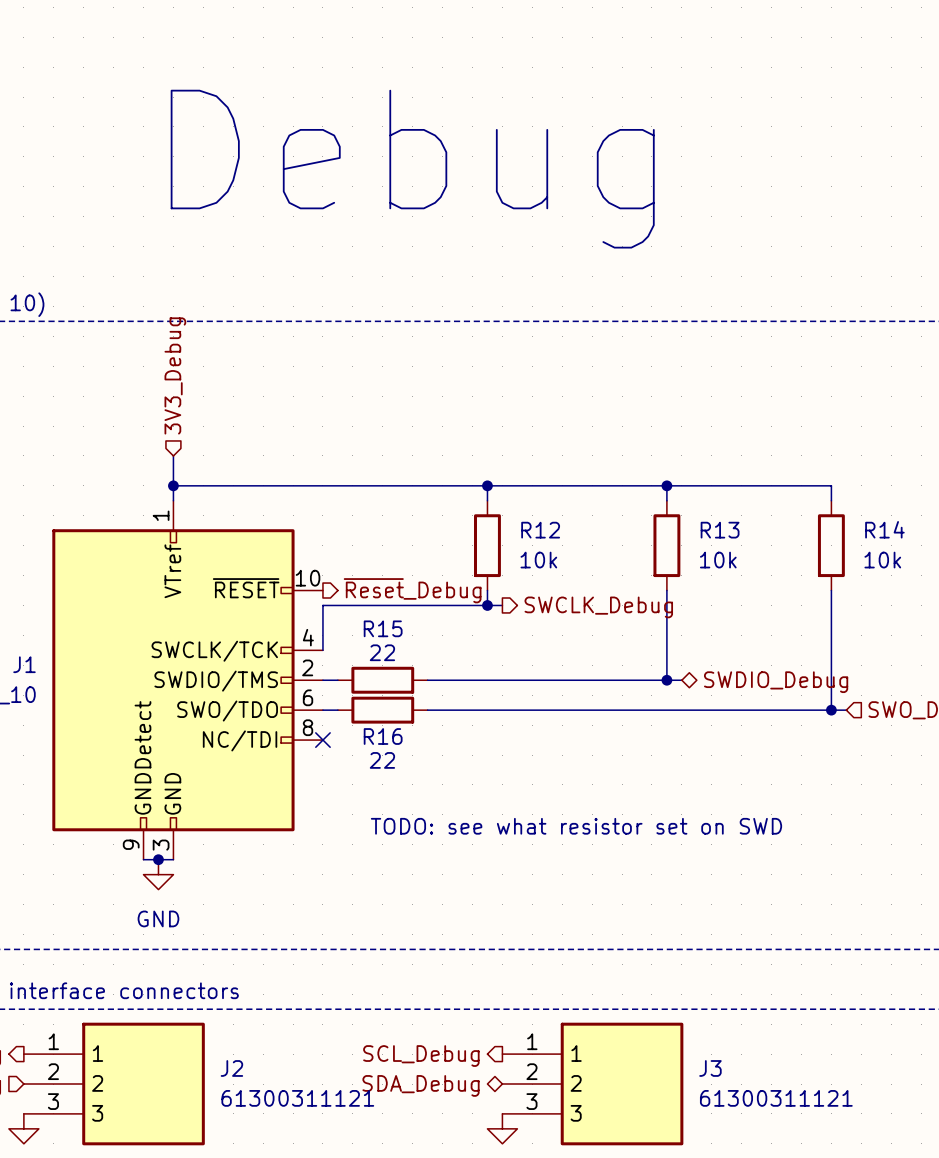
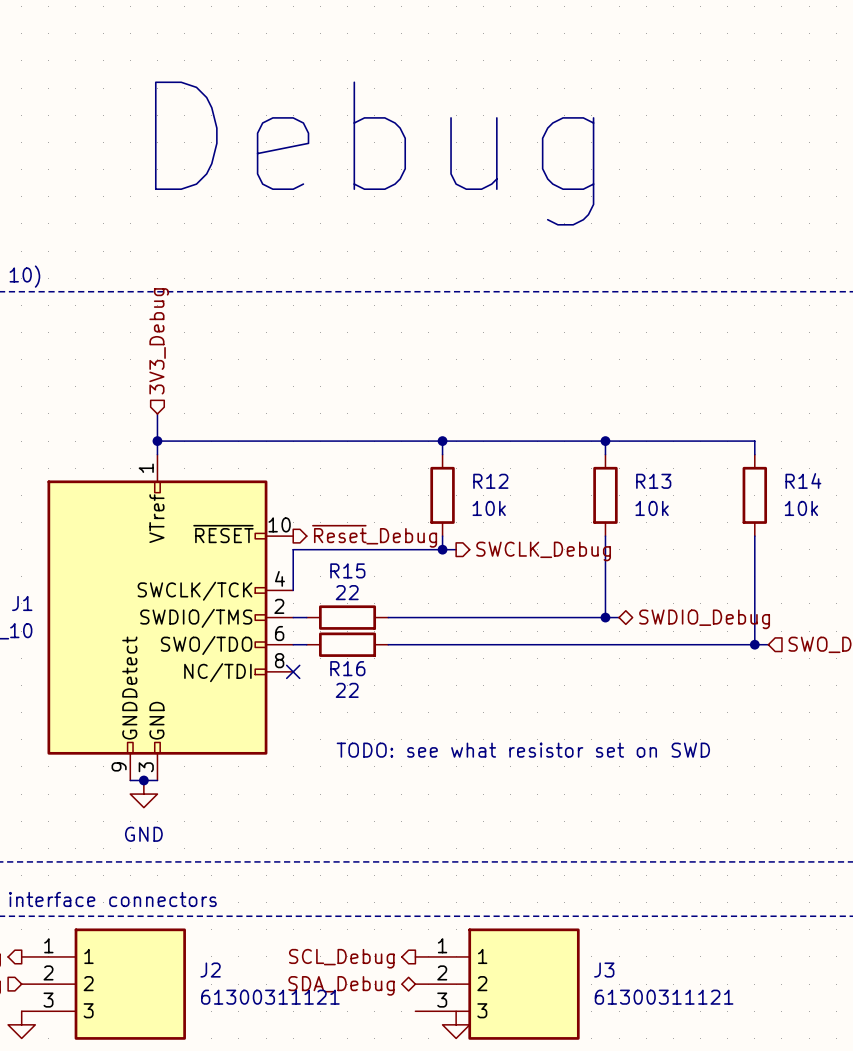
hierarchical label position: SCL_Debug (421, 1056) -> SCL_Debug (341, 958)
J3 position: (592, 1084) -> (497, 984)
hierarchical label position: SDA_Debug (421, 1085) -> SDA_Debug (341, 985)

